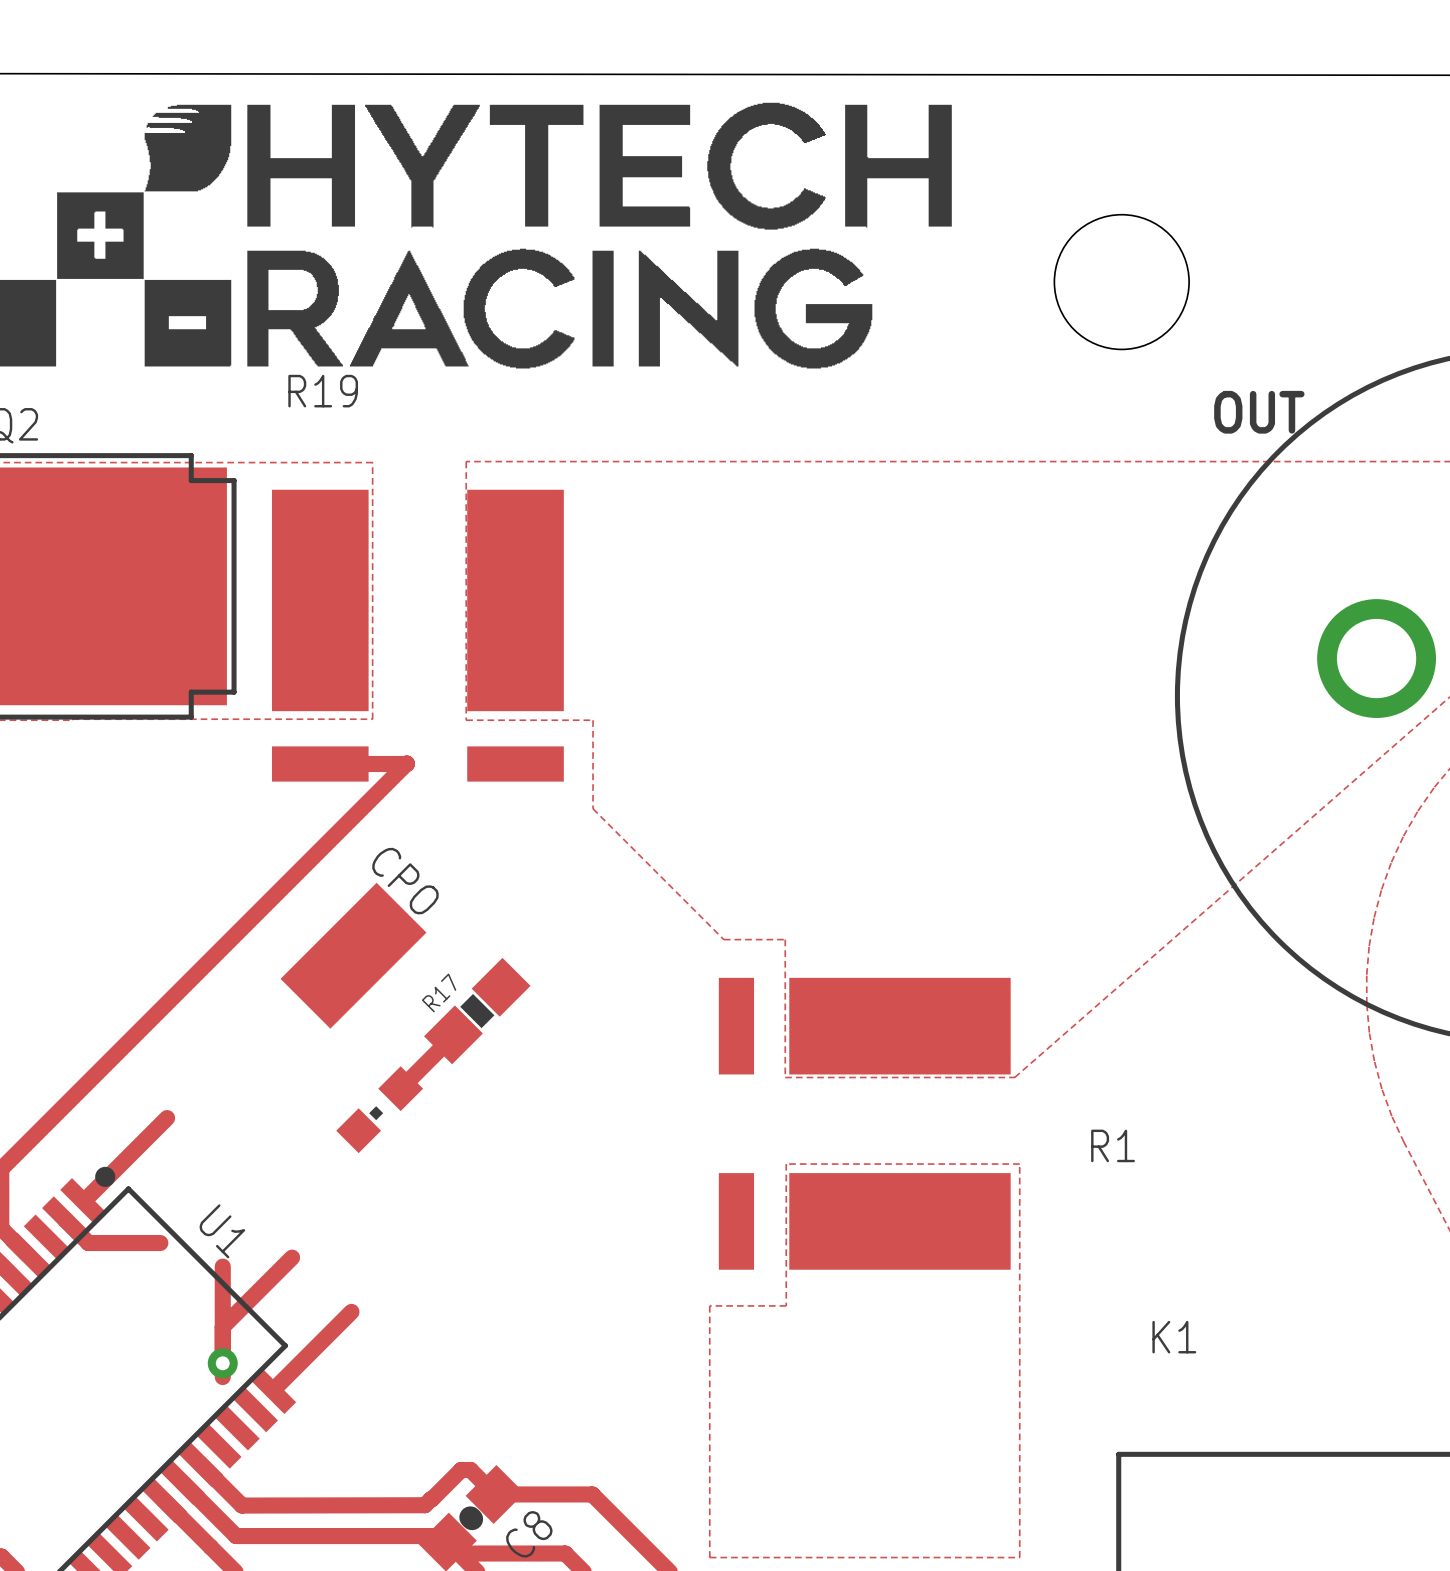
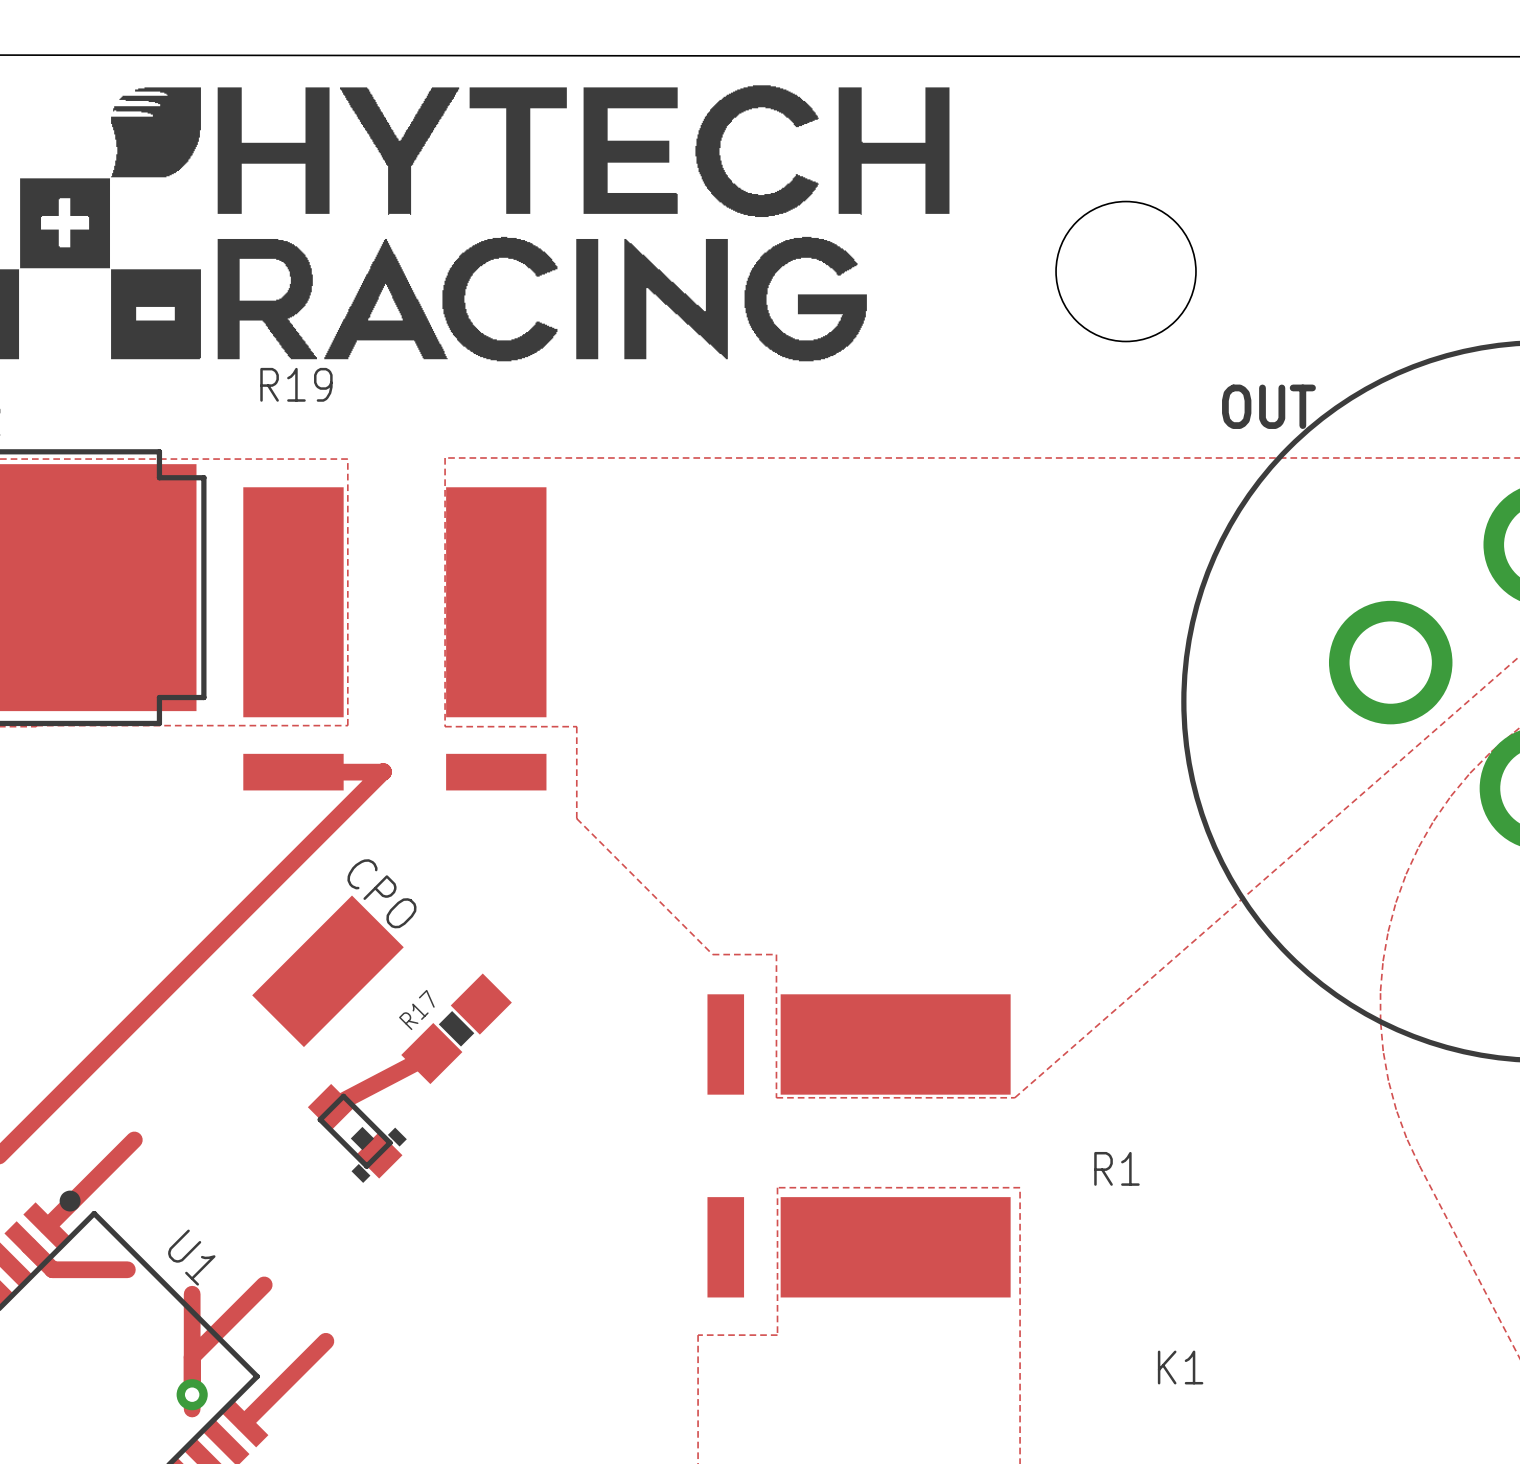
track: (453, 1035) (400, 1088) -> (431, 1054) (331, 1107)
part footprint: [336, 1066, 424, 1154] -> [307, 1083, 407, 1183]

